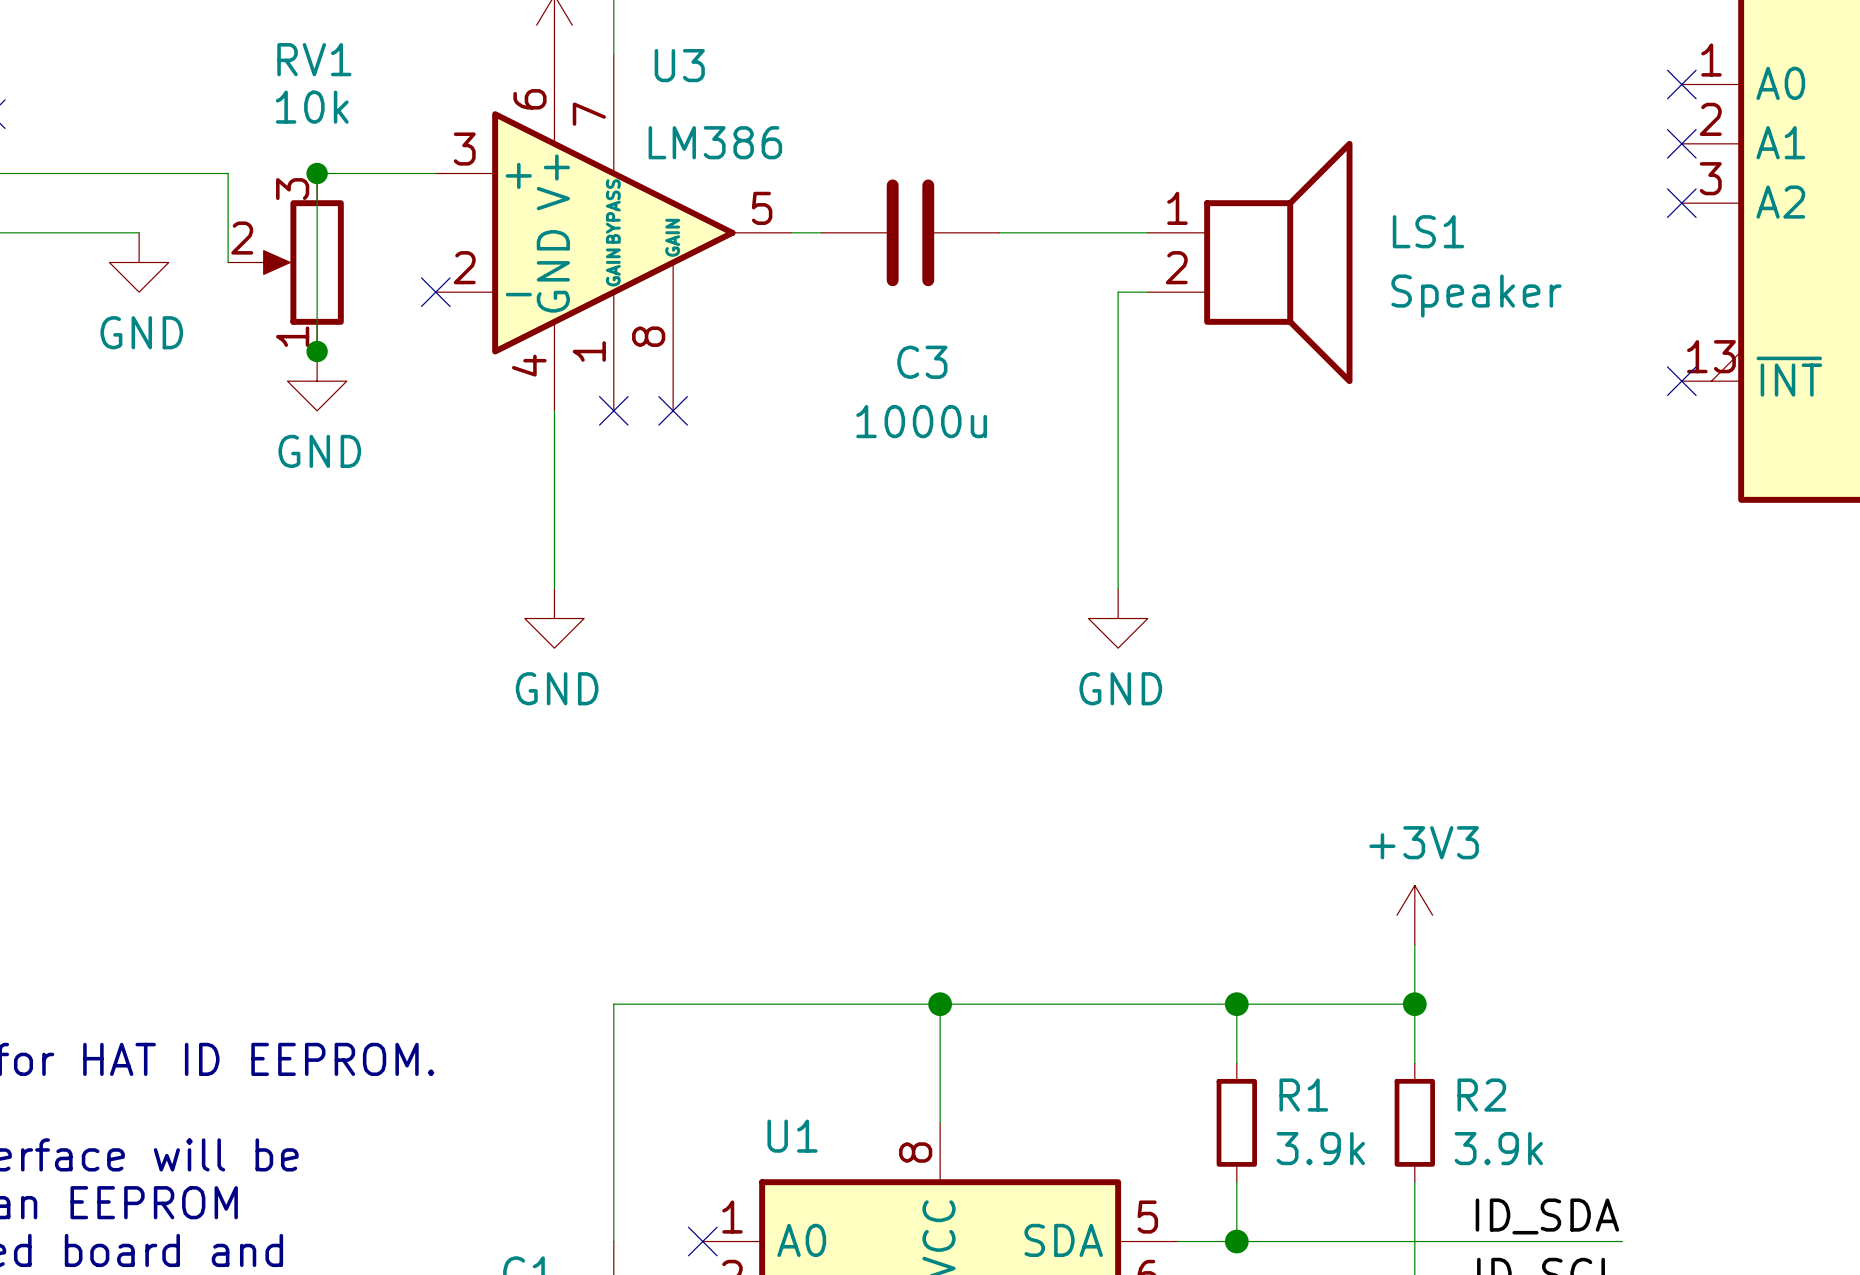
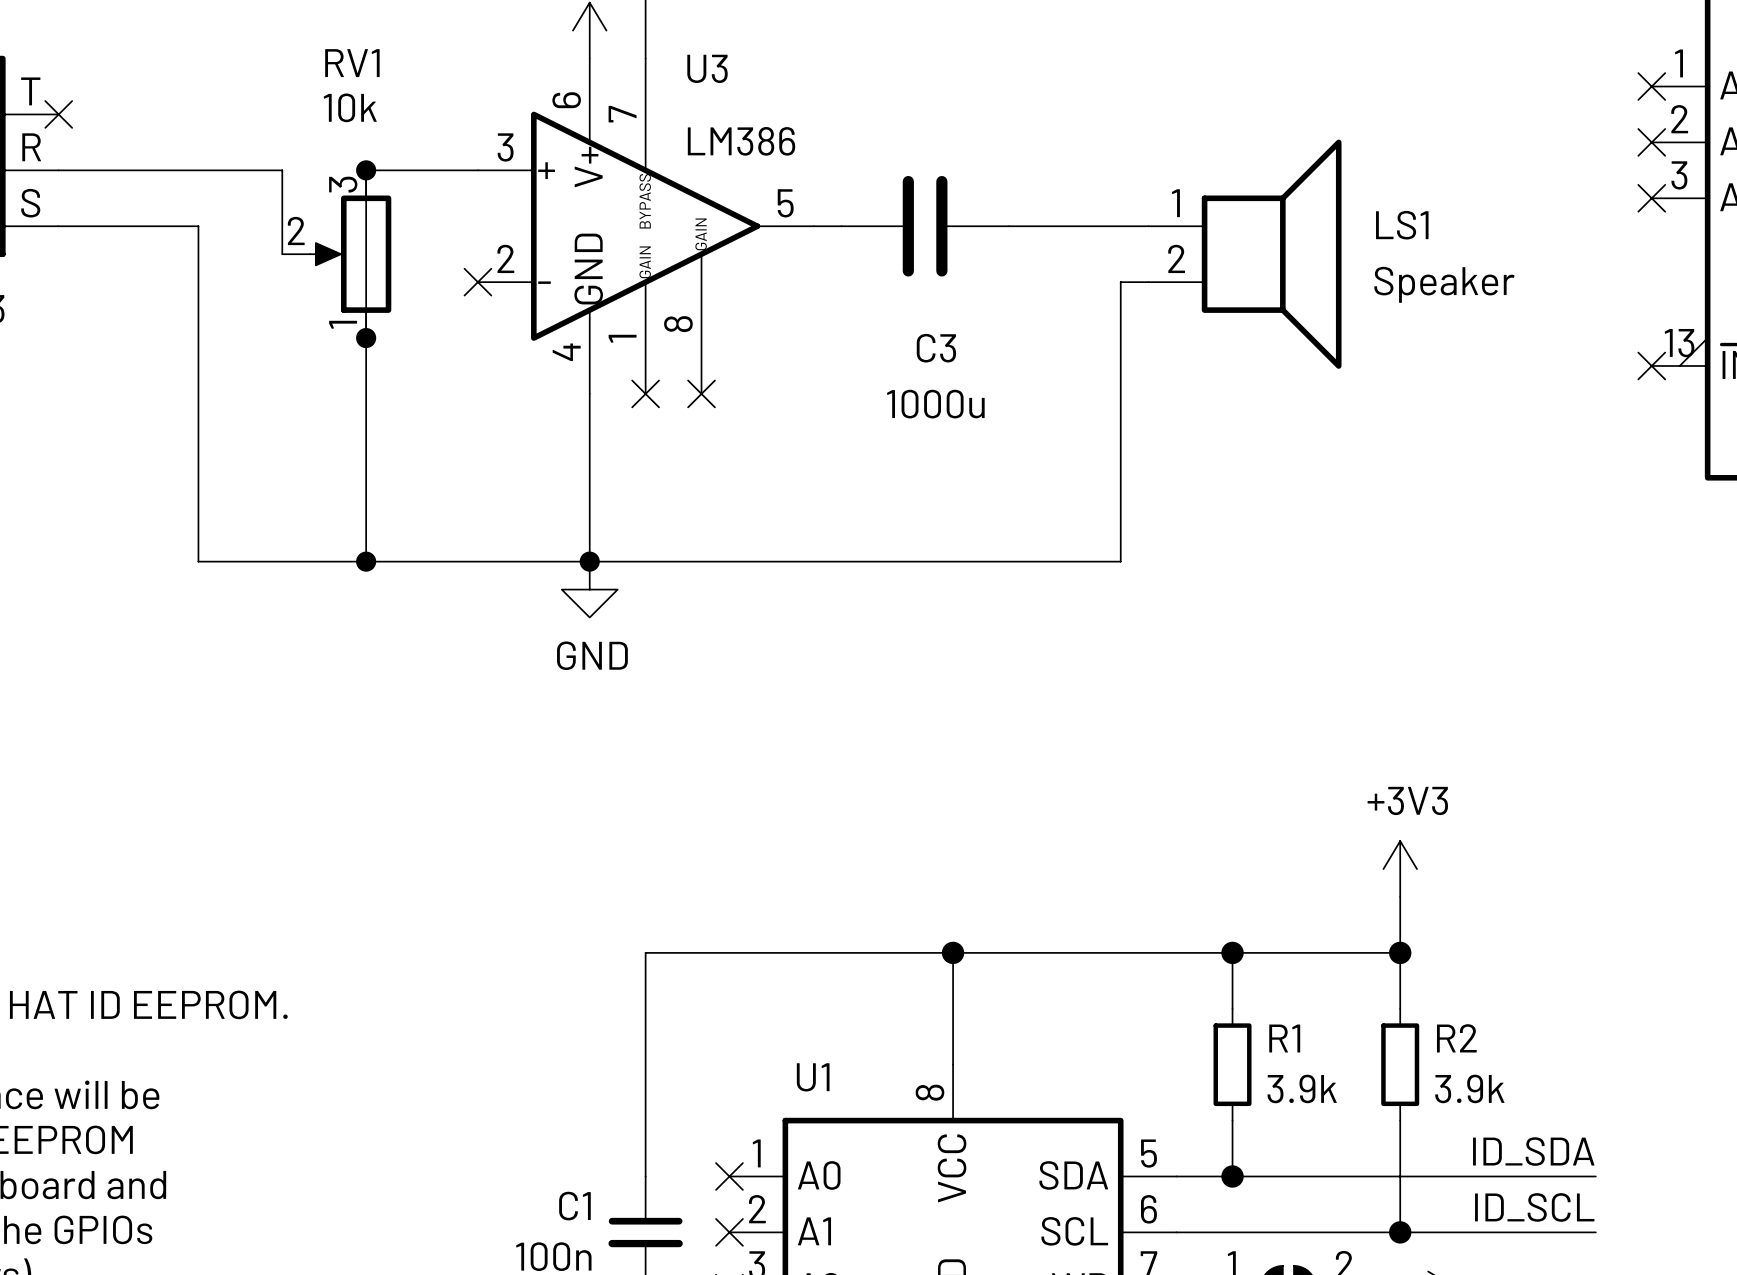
wire: none -> (198, 226) (198, 561) (1120, 561)
power symbol: GND (139, 262) -> none
wire: none -> (366, 338) (366, 561)
power symbol: GND (317, 381) -> none
junction: none -> (366, 561)
junction: none -> (589, 561)
power symbol: GND (1118, 618) -> none

